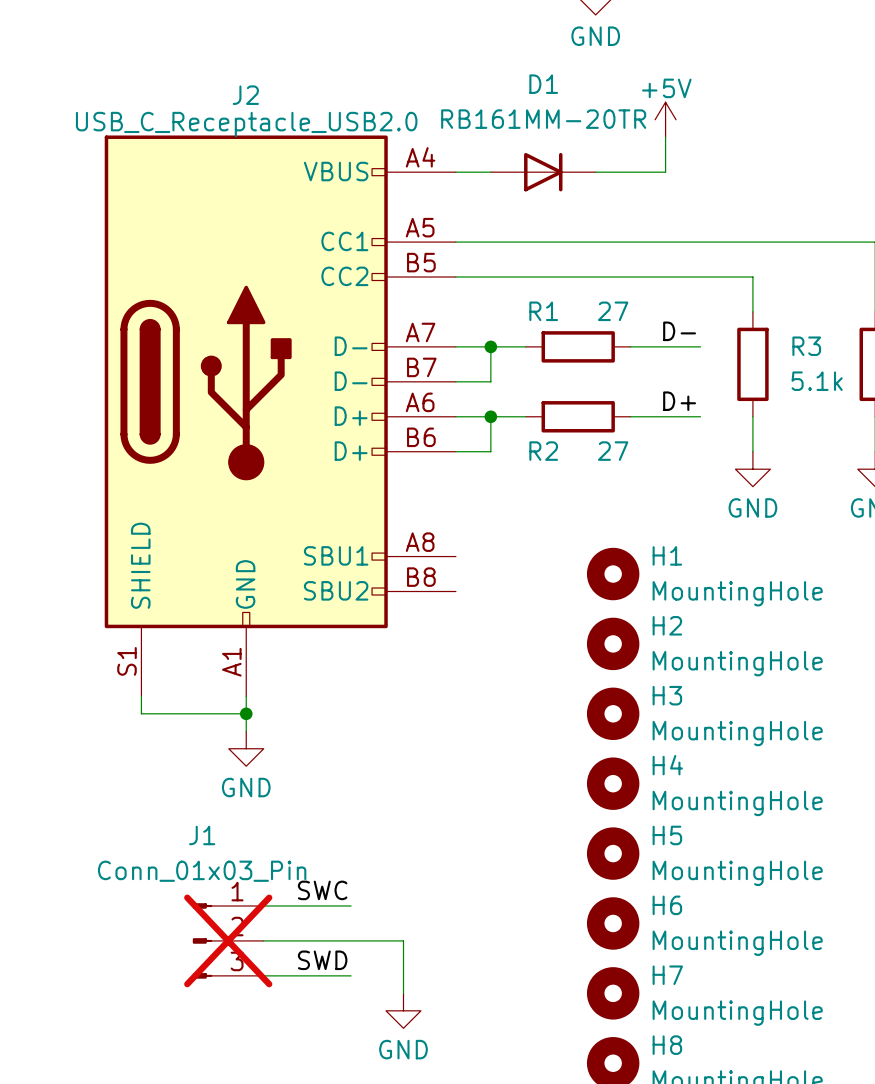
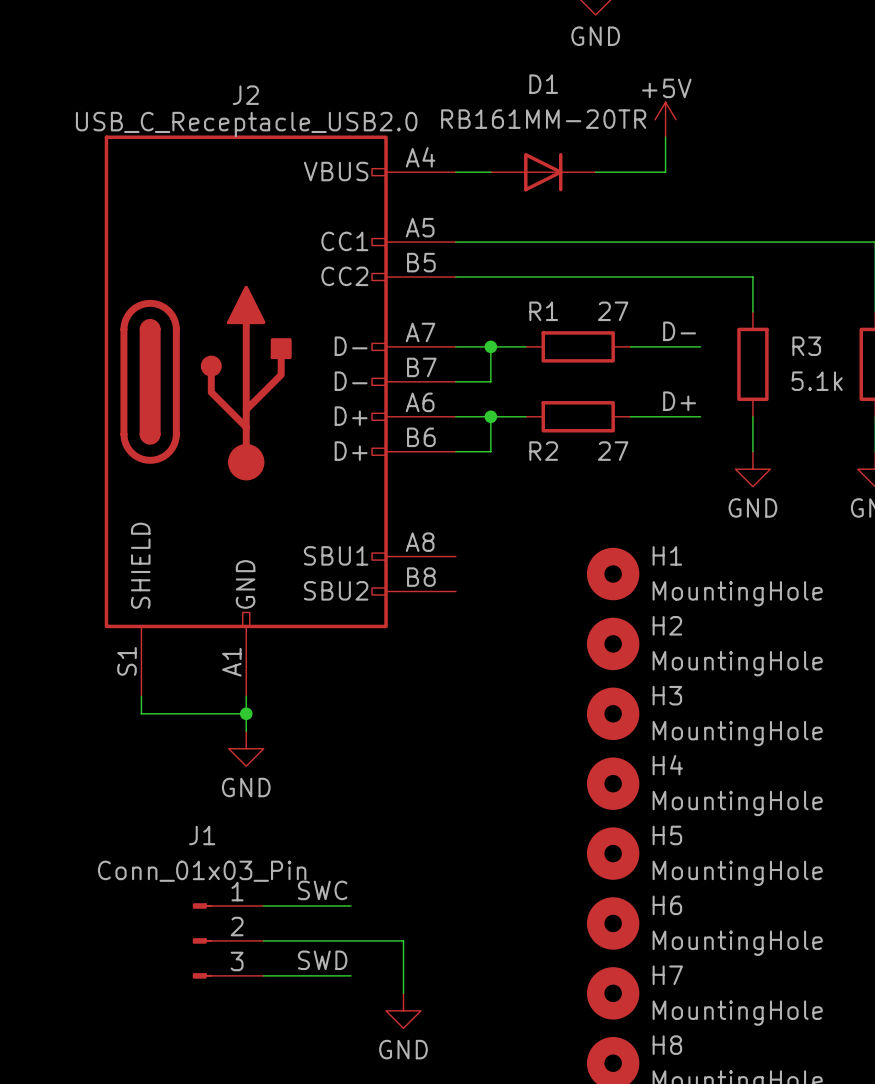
J1 do-not-place cross: (228, 940) -> none

